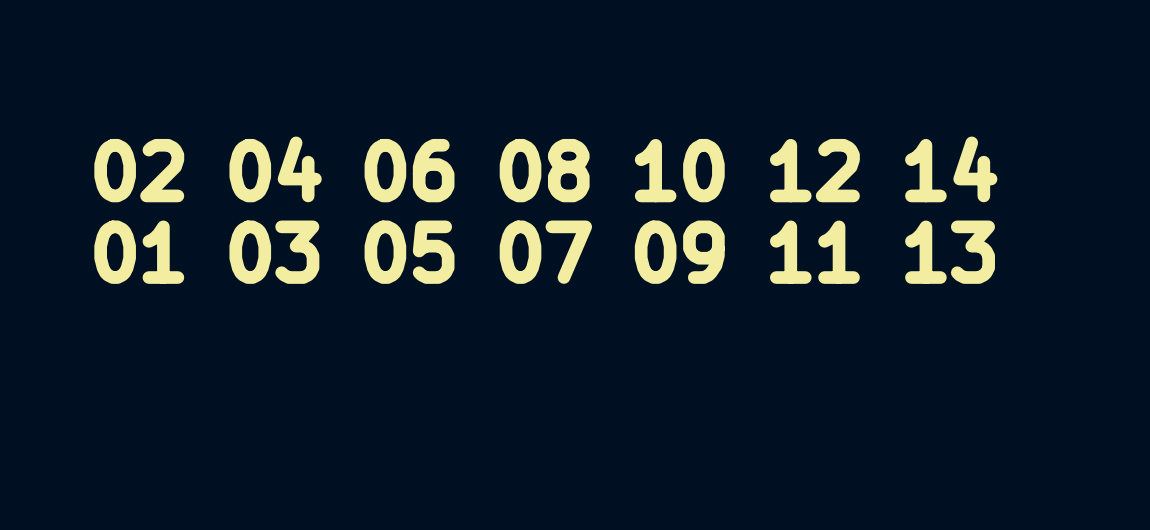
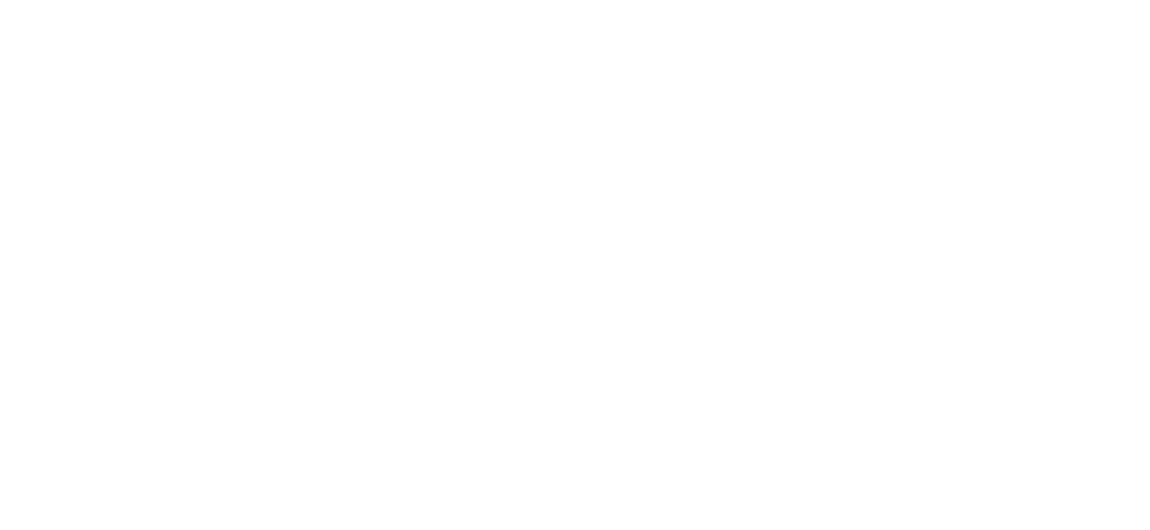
text: 02 04 06 08 10 12 14 (545, 169) -> none
text: 01 03 05 07 09 11 13 (544, 252) -> none

